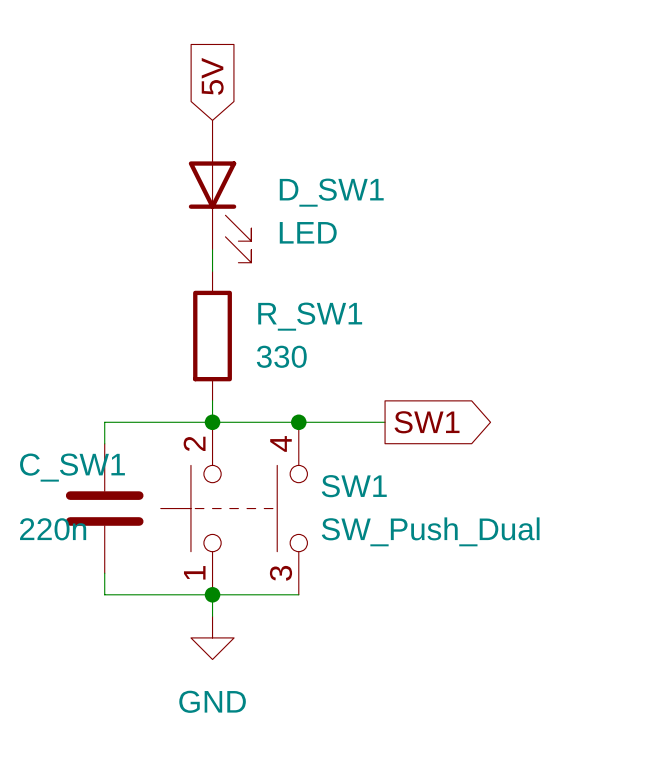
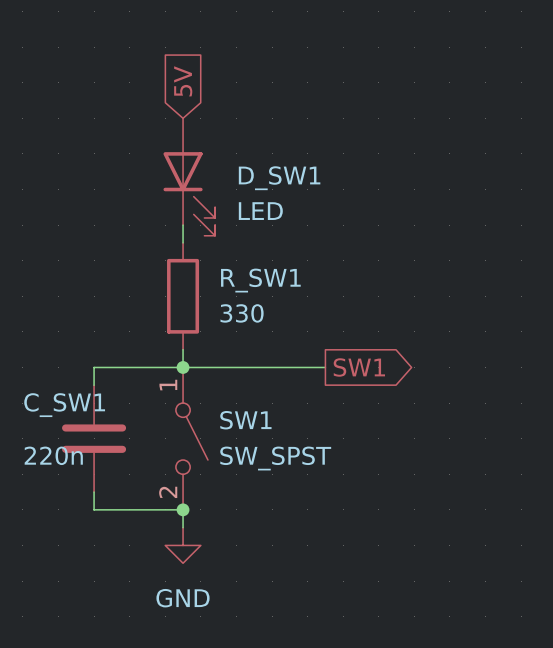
SW1 symbol: [160, 422, 308, 595] -> [175, 367, 208, 510]
junction: (298, 422) -> none
SW1 name position: SW1 (354, 486) -> SW1 (245, 420)
SW1 value: SW_Push_Dual (430, 531) -> SW_SPST (275, 458)
wire: (212, 594) (298, 594) -> none

